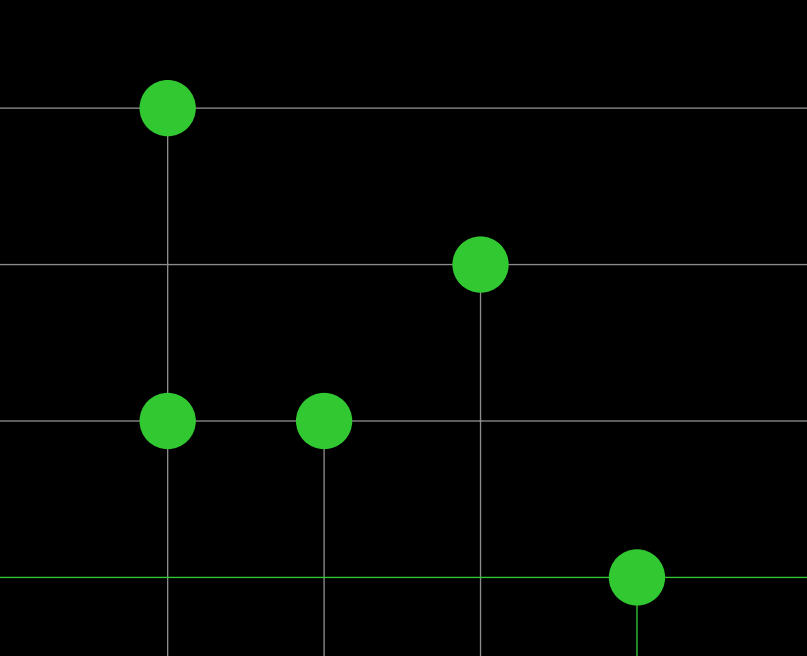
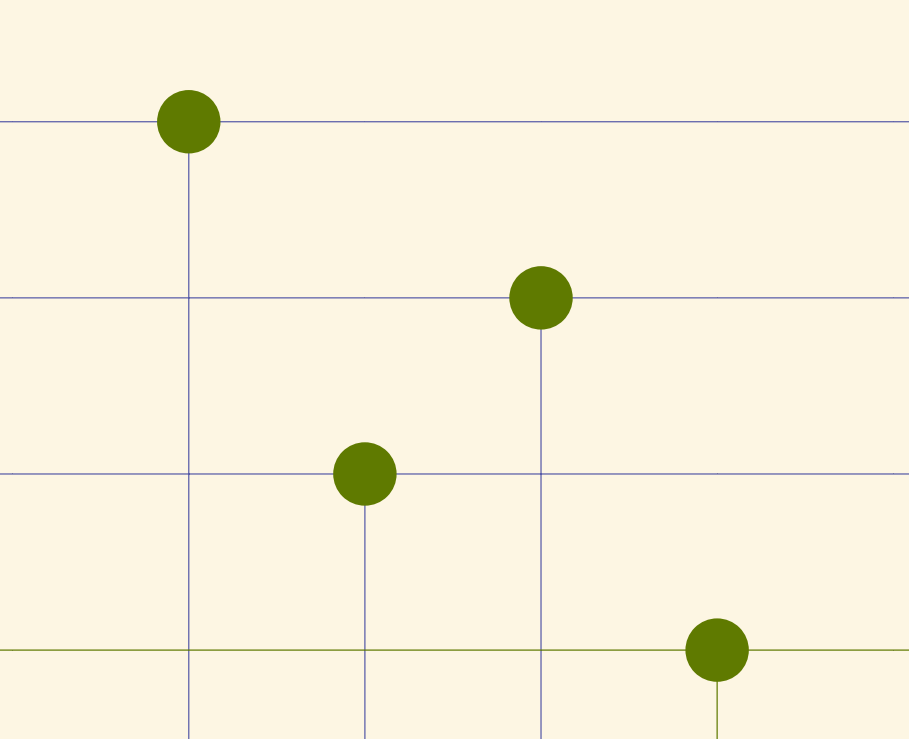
junction: (167, 420) -> none

